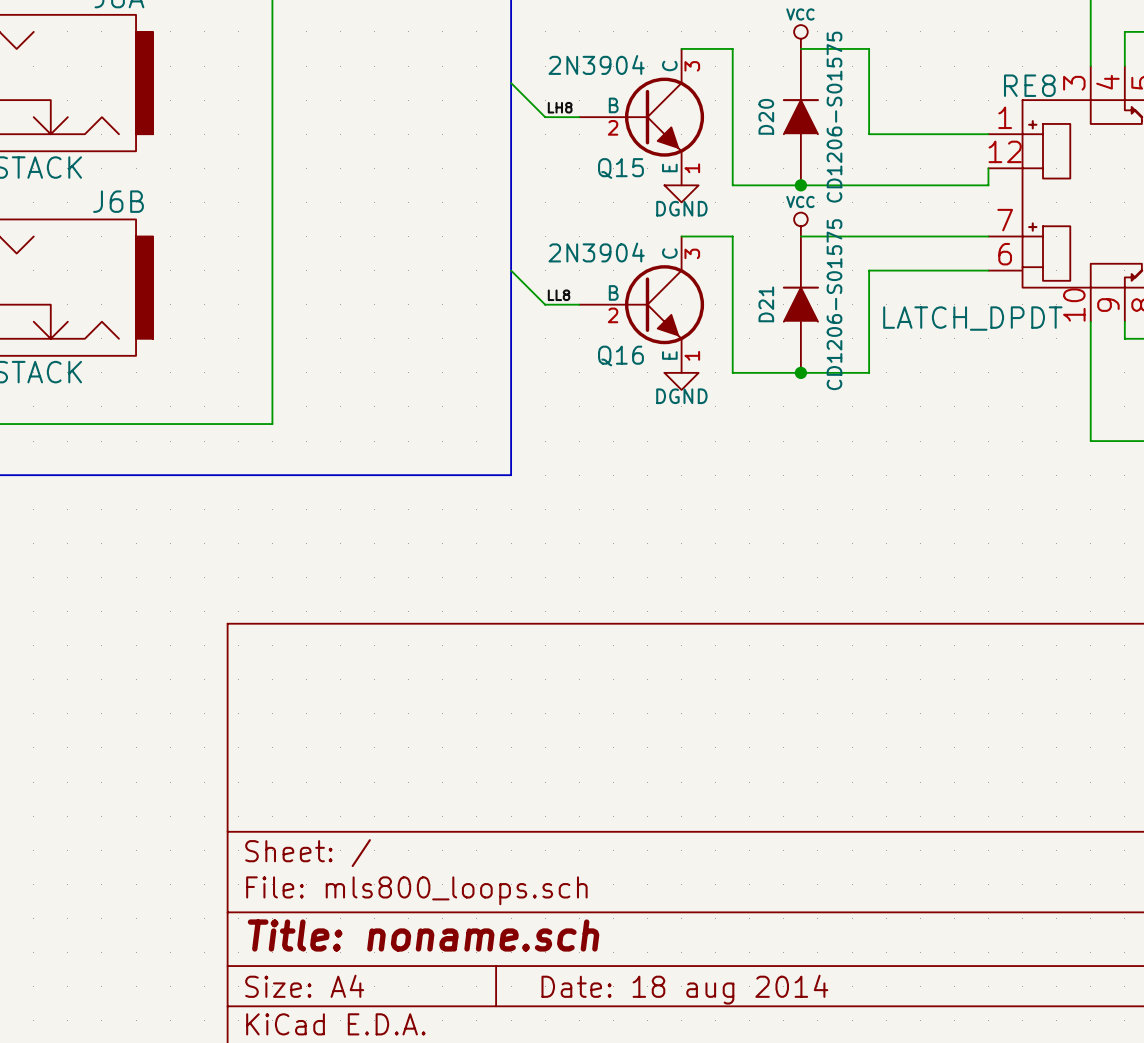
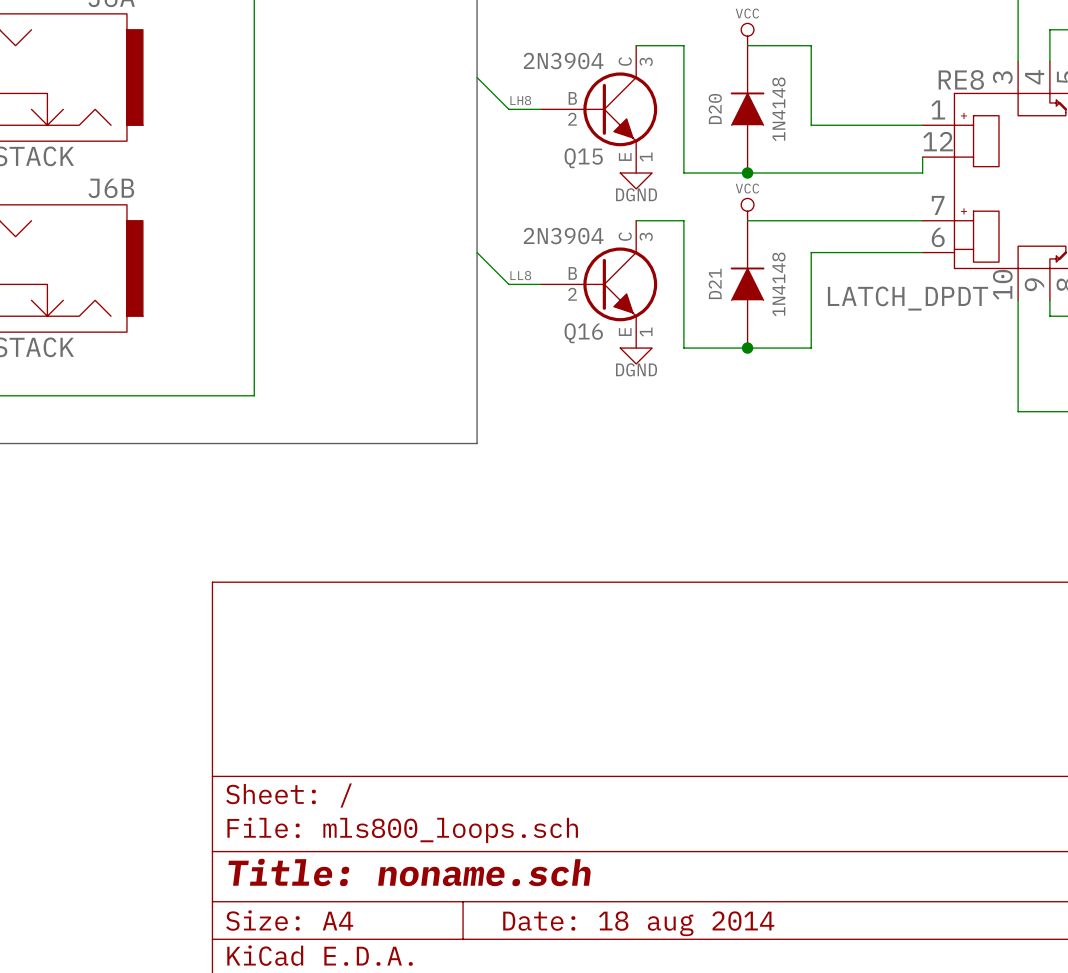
D20 value: CD1206-S01575 (834, 117) -> 1N4148 (778, 109)
D21 value: CD1206-S01575 (834, 304) -> 1N4148 (778, 284)

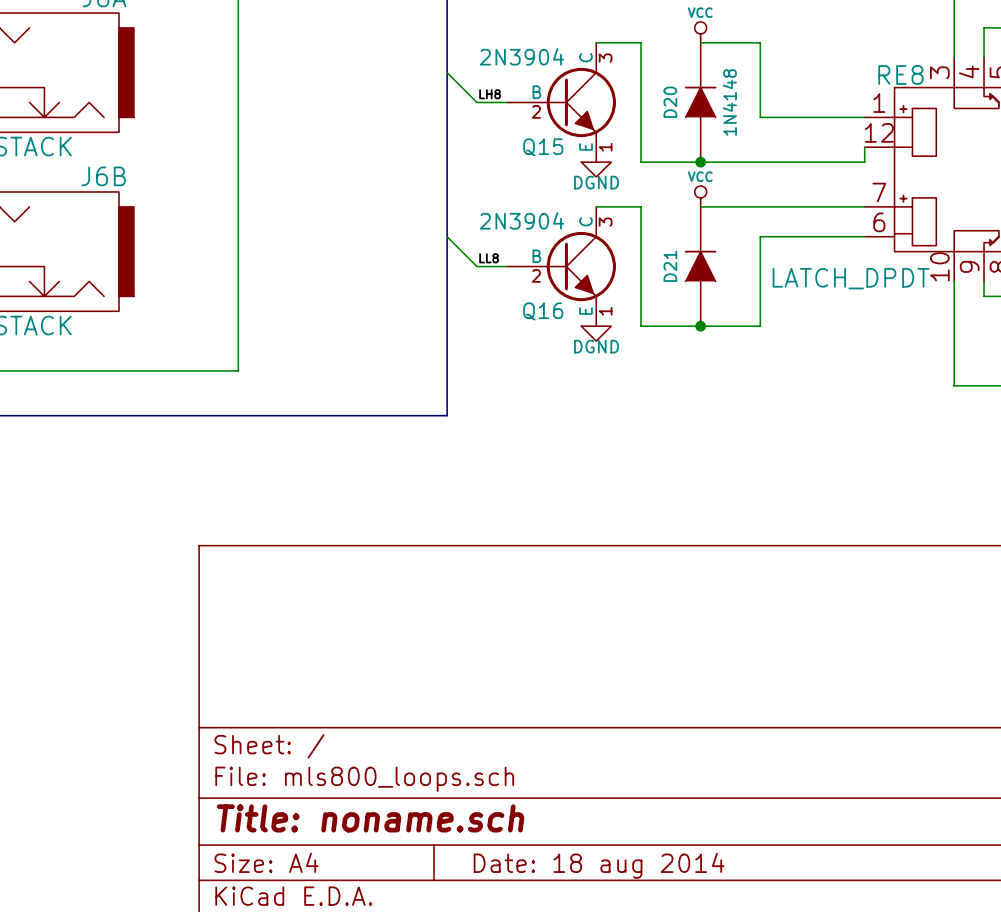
D21 value: 1N4148 (778, 284) -> none

